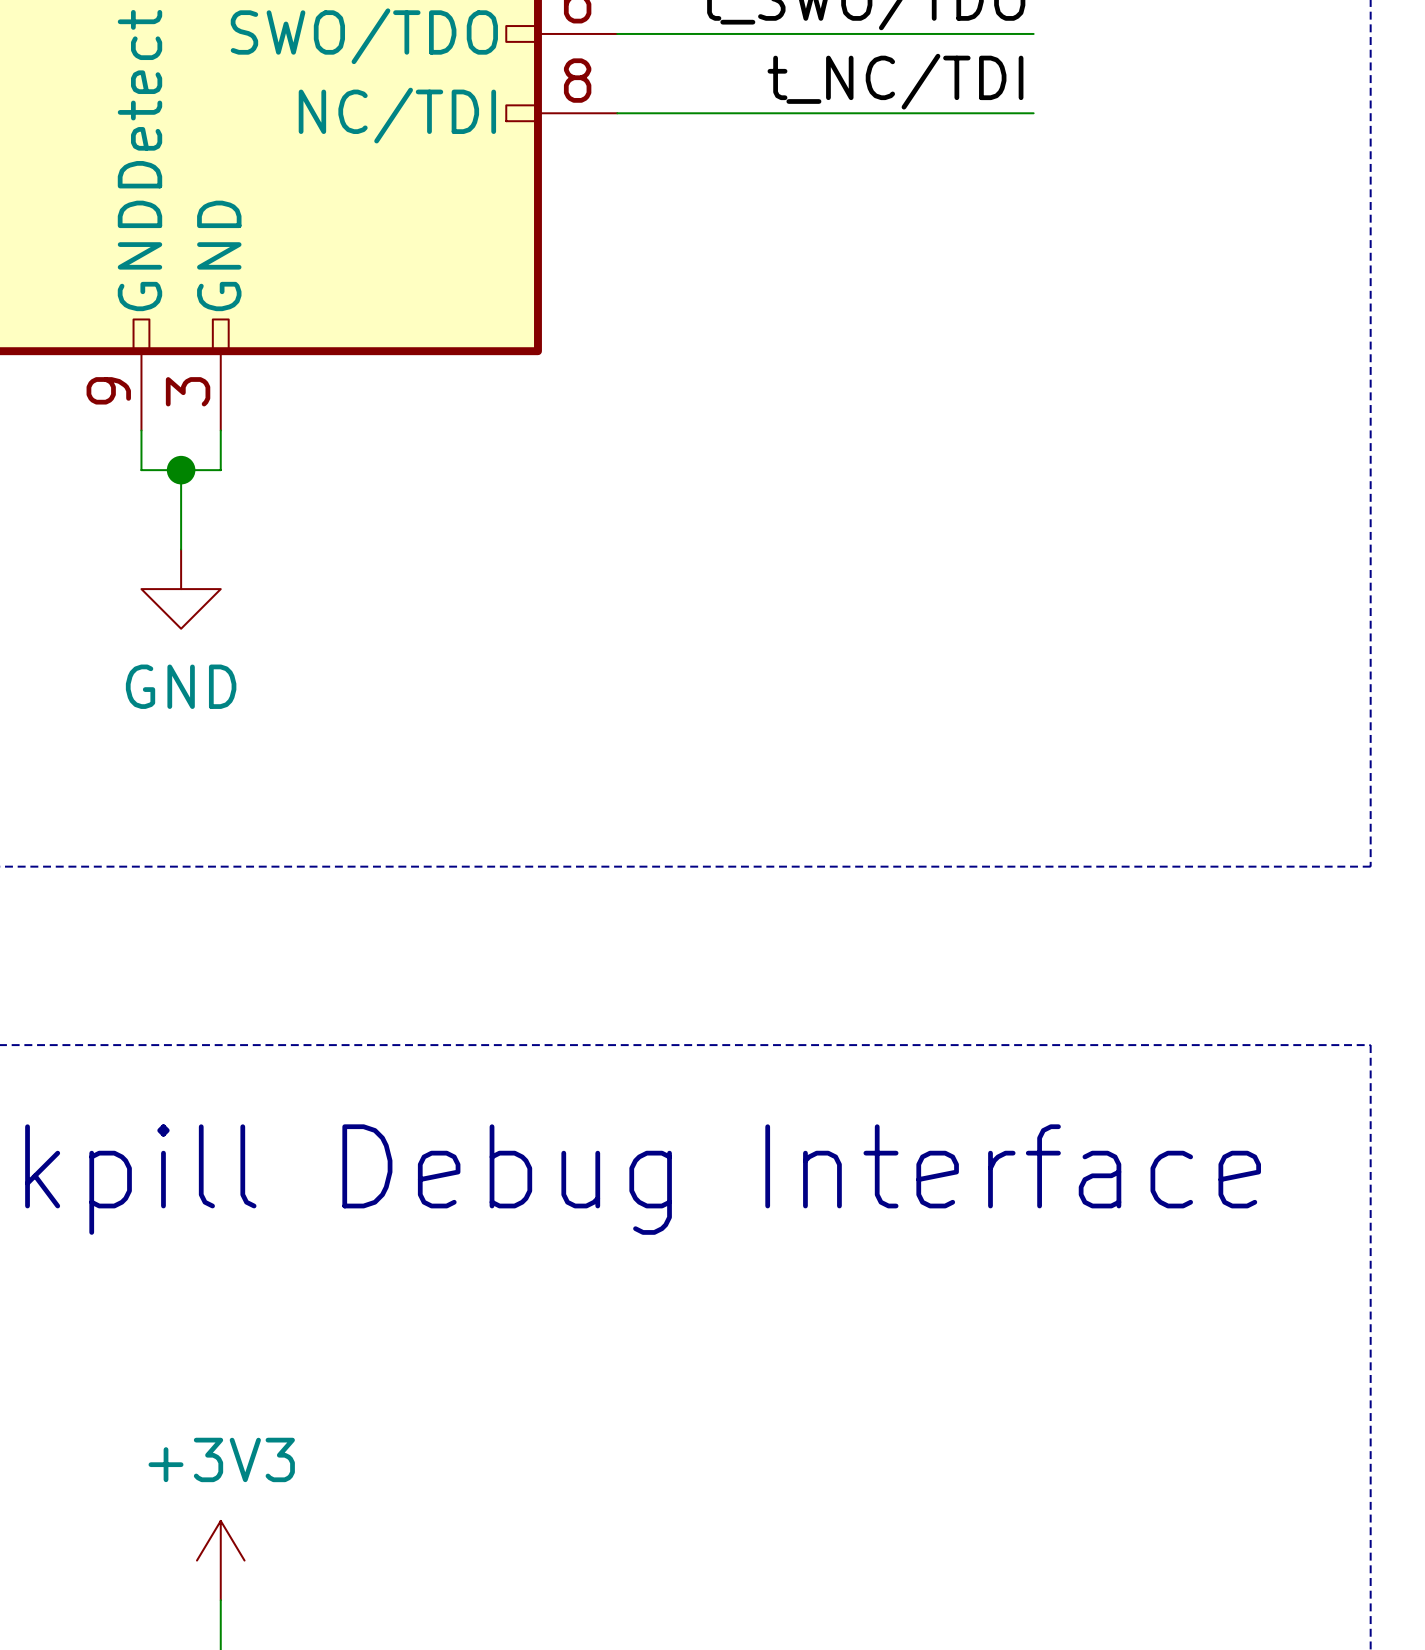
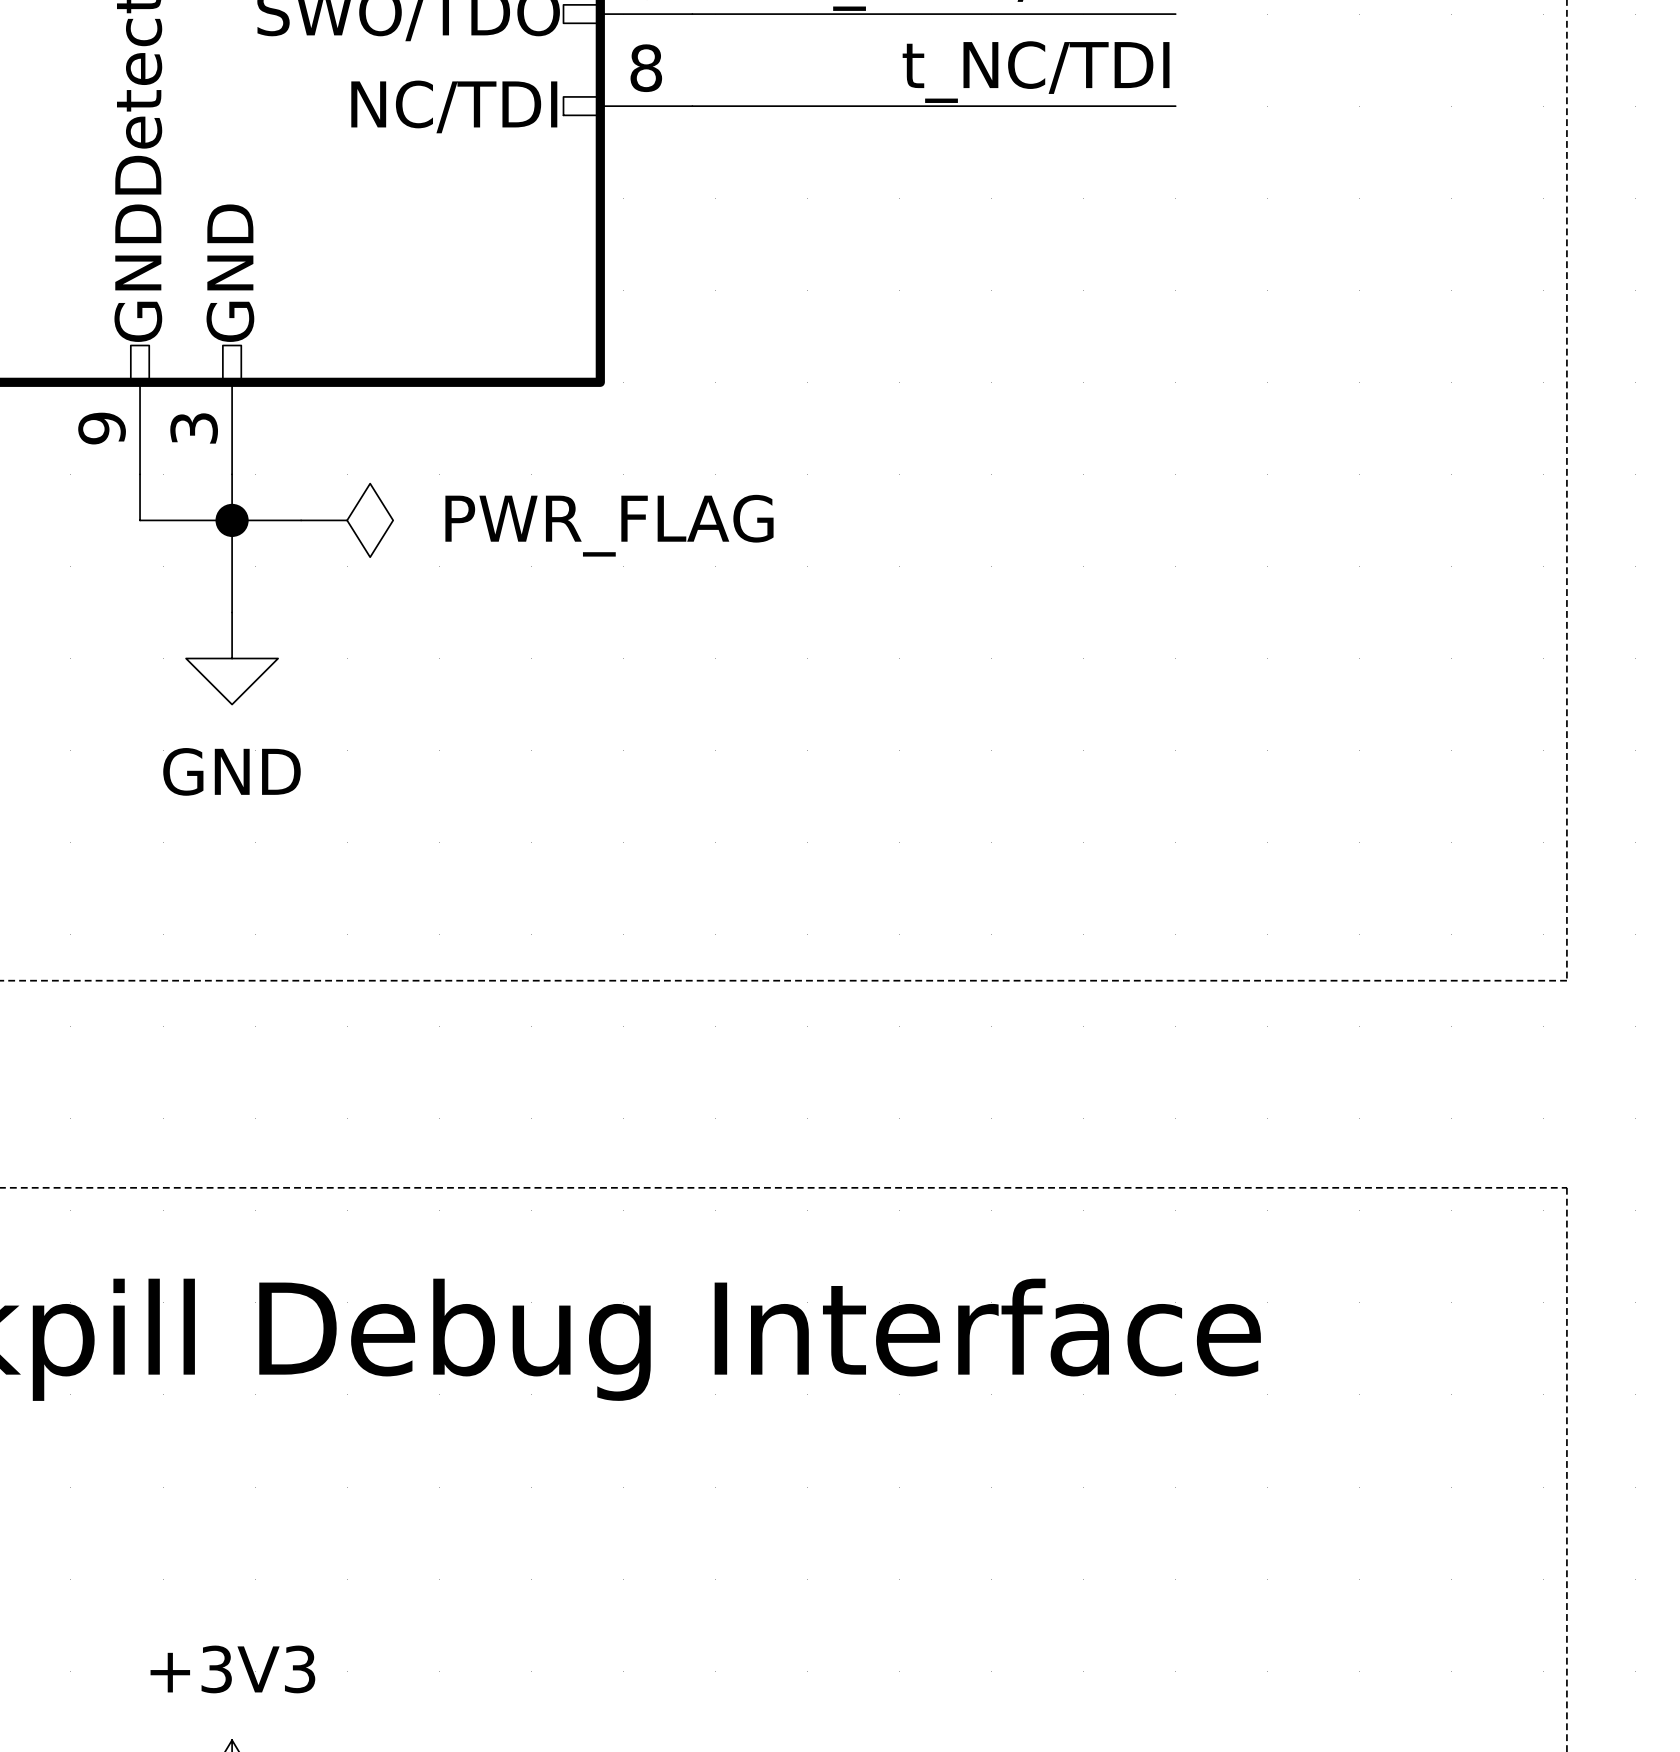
wire: (181, 470) (181, 549) -> none
junction position: (181, 470) -> (232, 520)
wire: none -> (301, 520) (232, 520) (232, 612)
power symbol: none -> PWR_FLAG (347, 520)
power symbol position: GND (181, 589) -> GND (232, 658)

